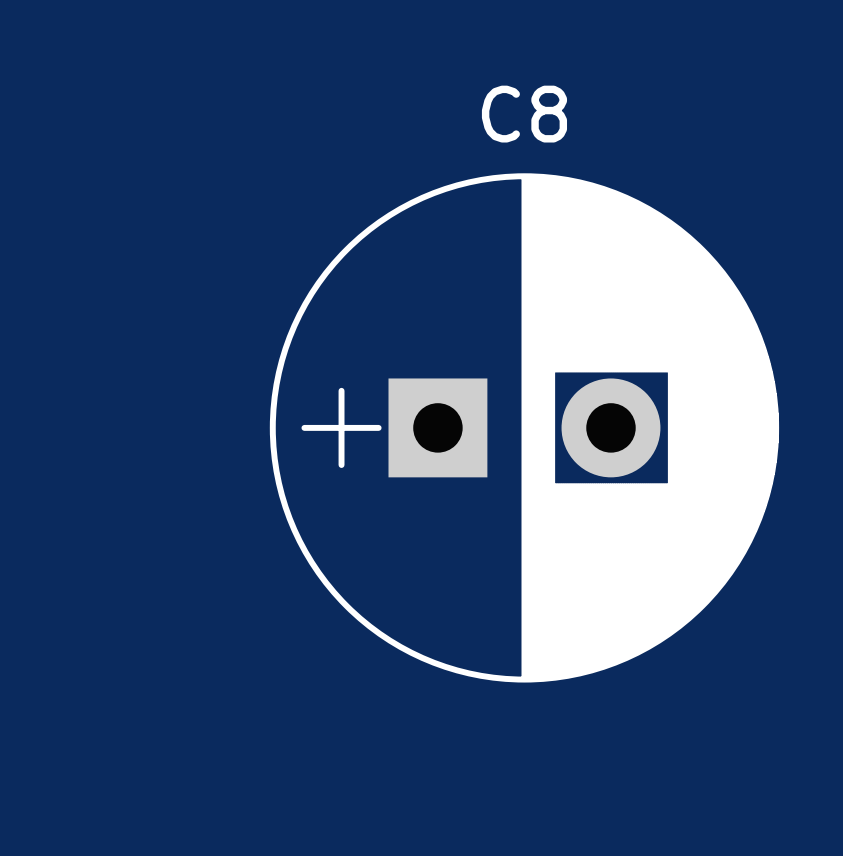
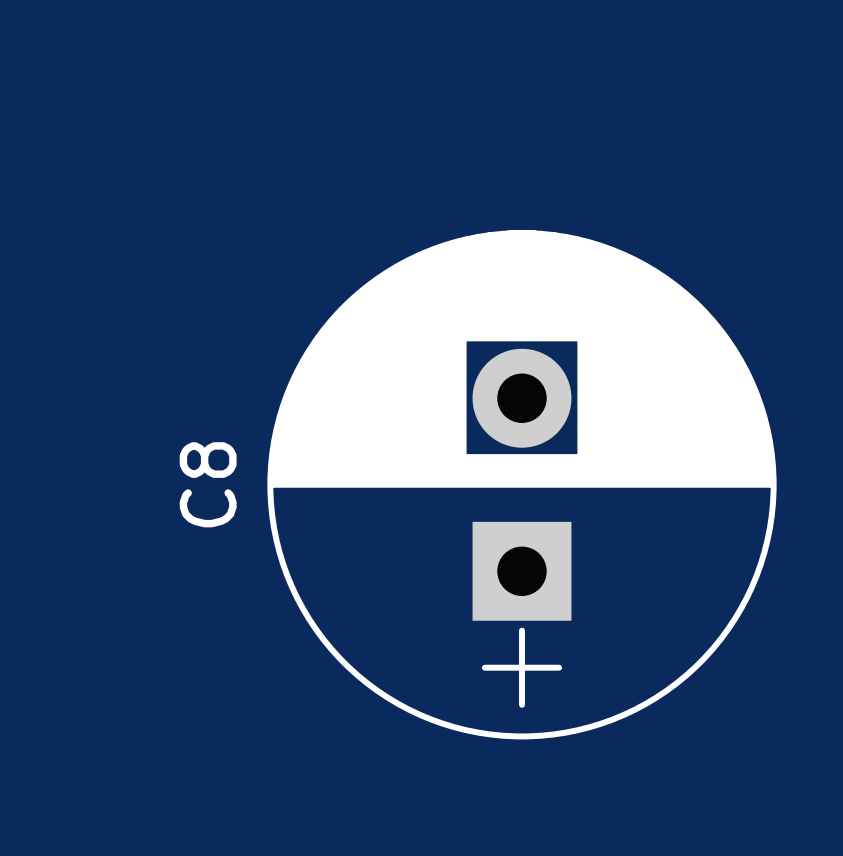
C8 rotation: 0° (524, 427) -> 90° counterclockwise (521, 484)

